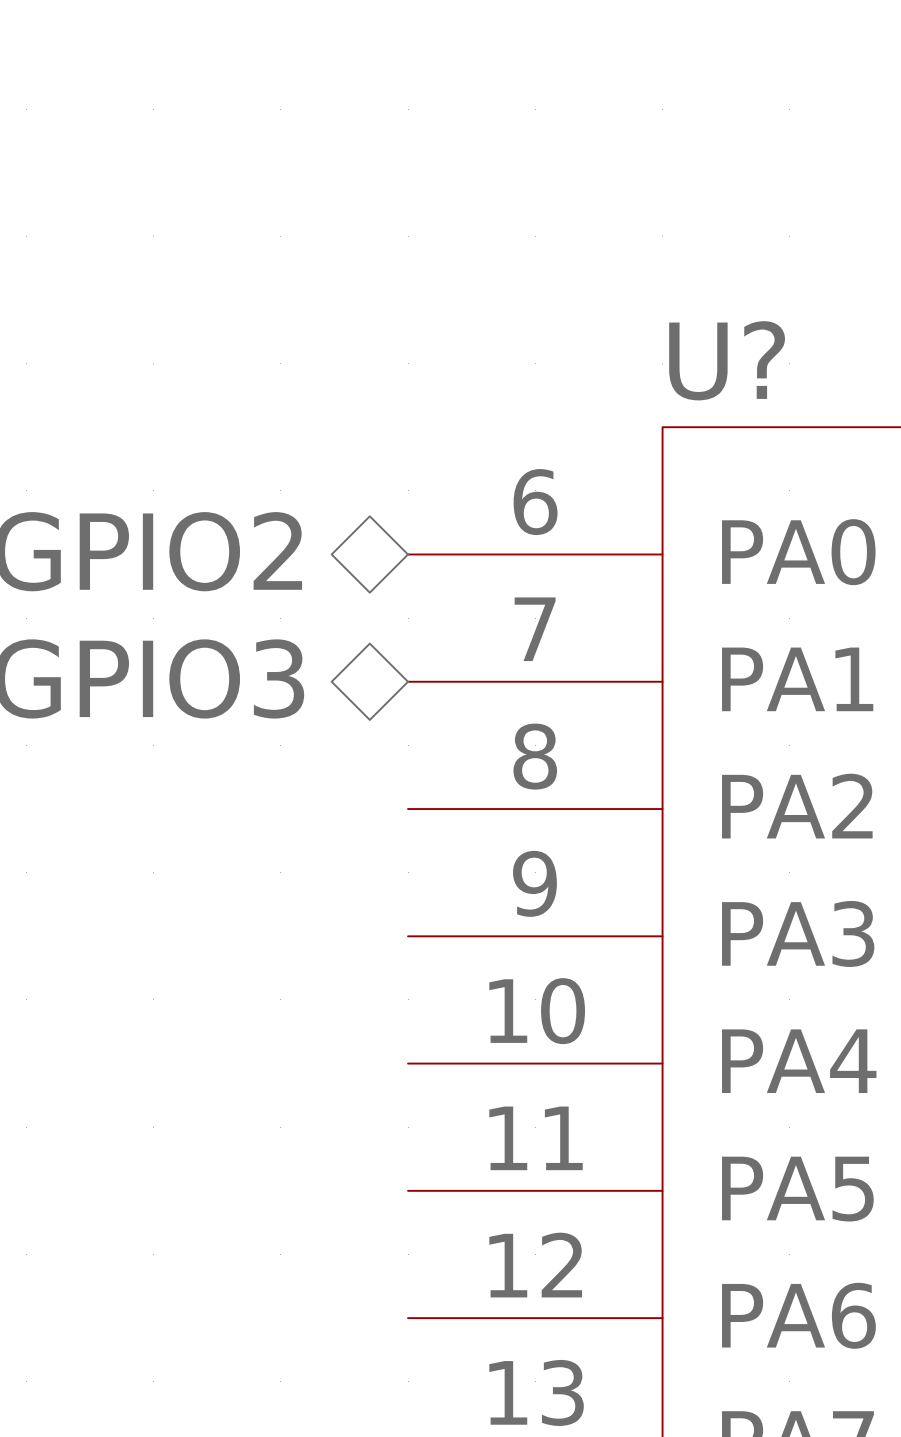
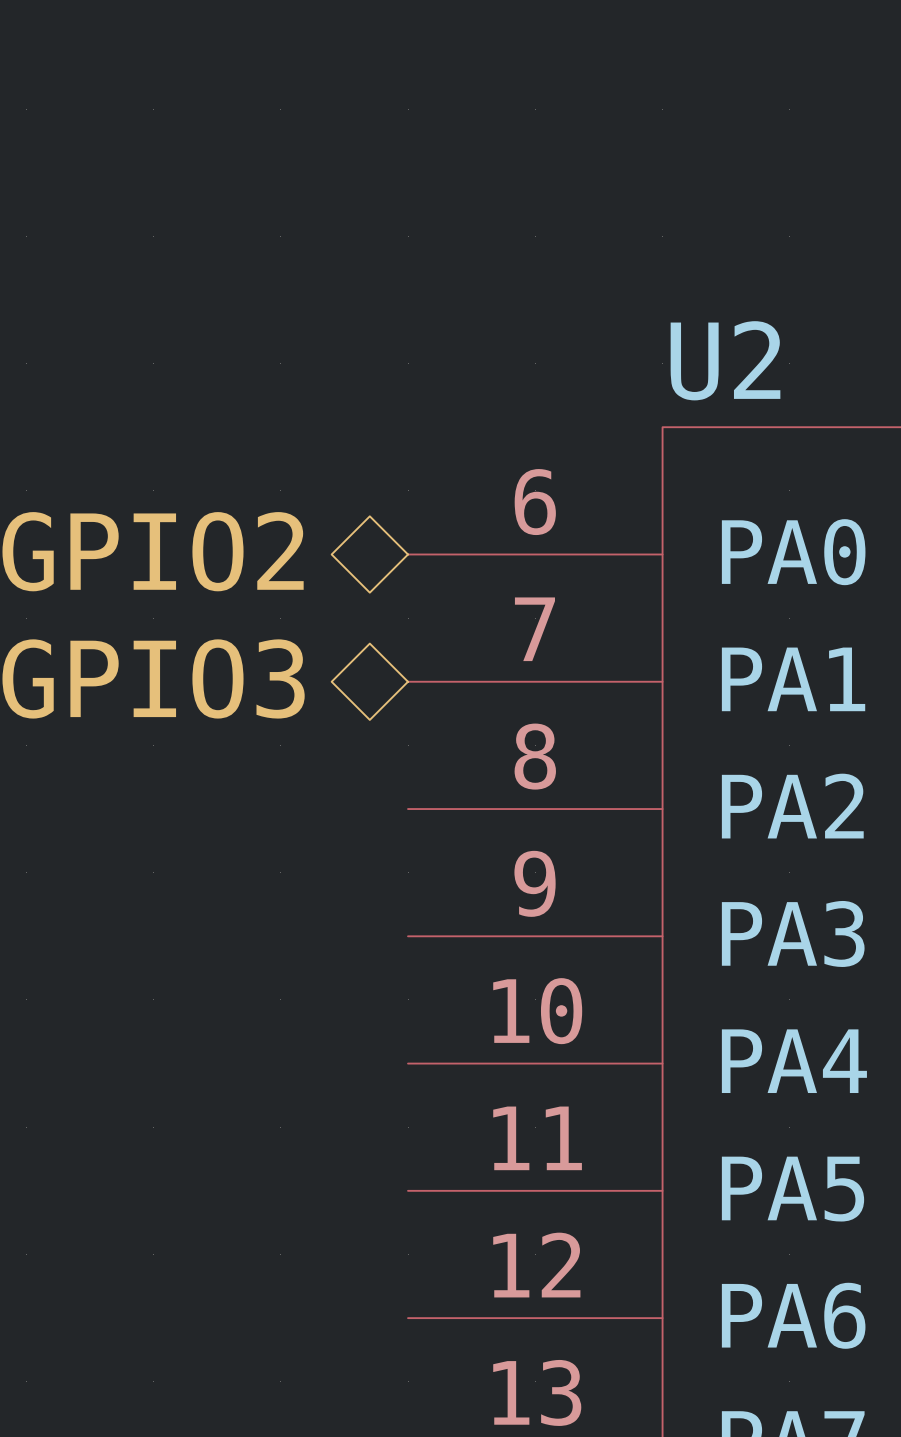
U? name: U? (727, 360) -> U2 (725, 360)

